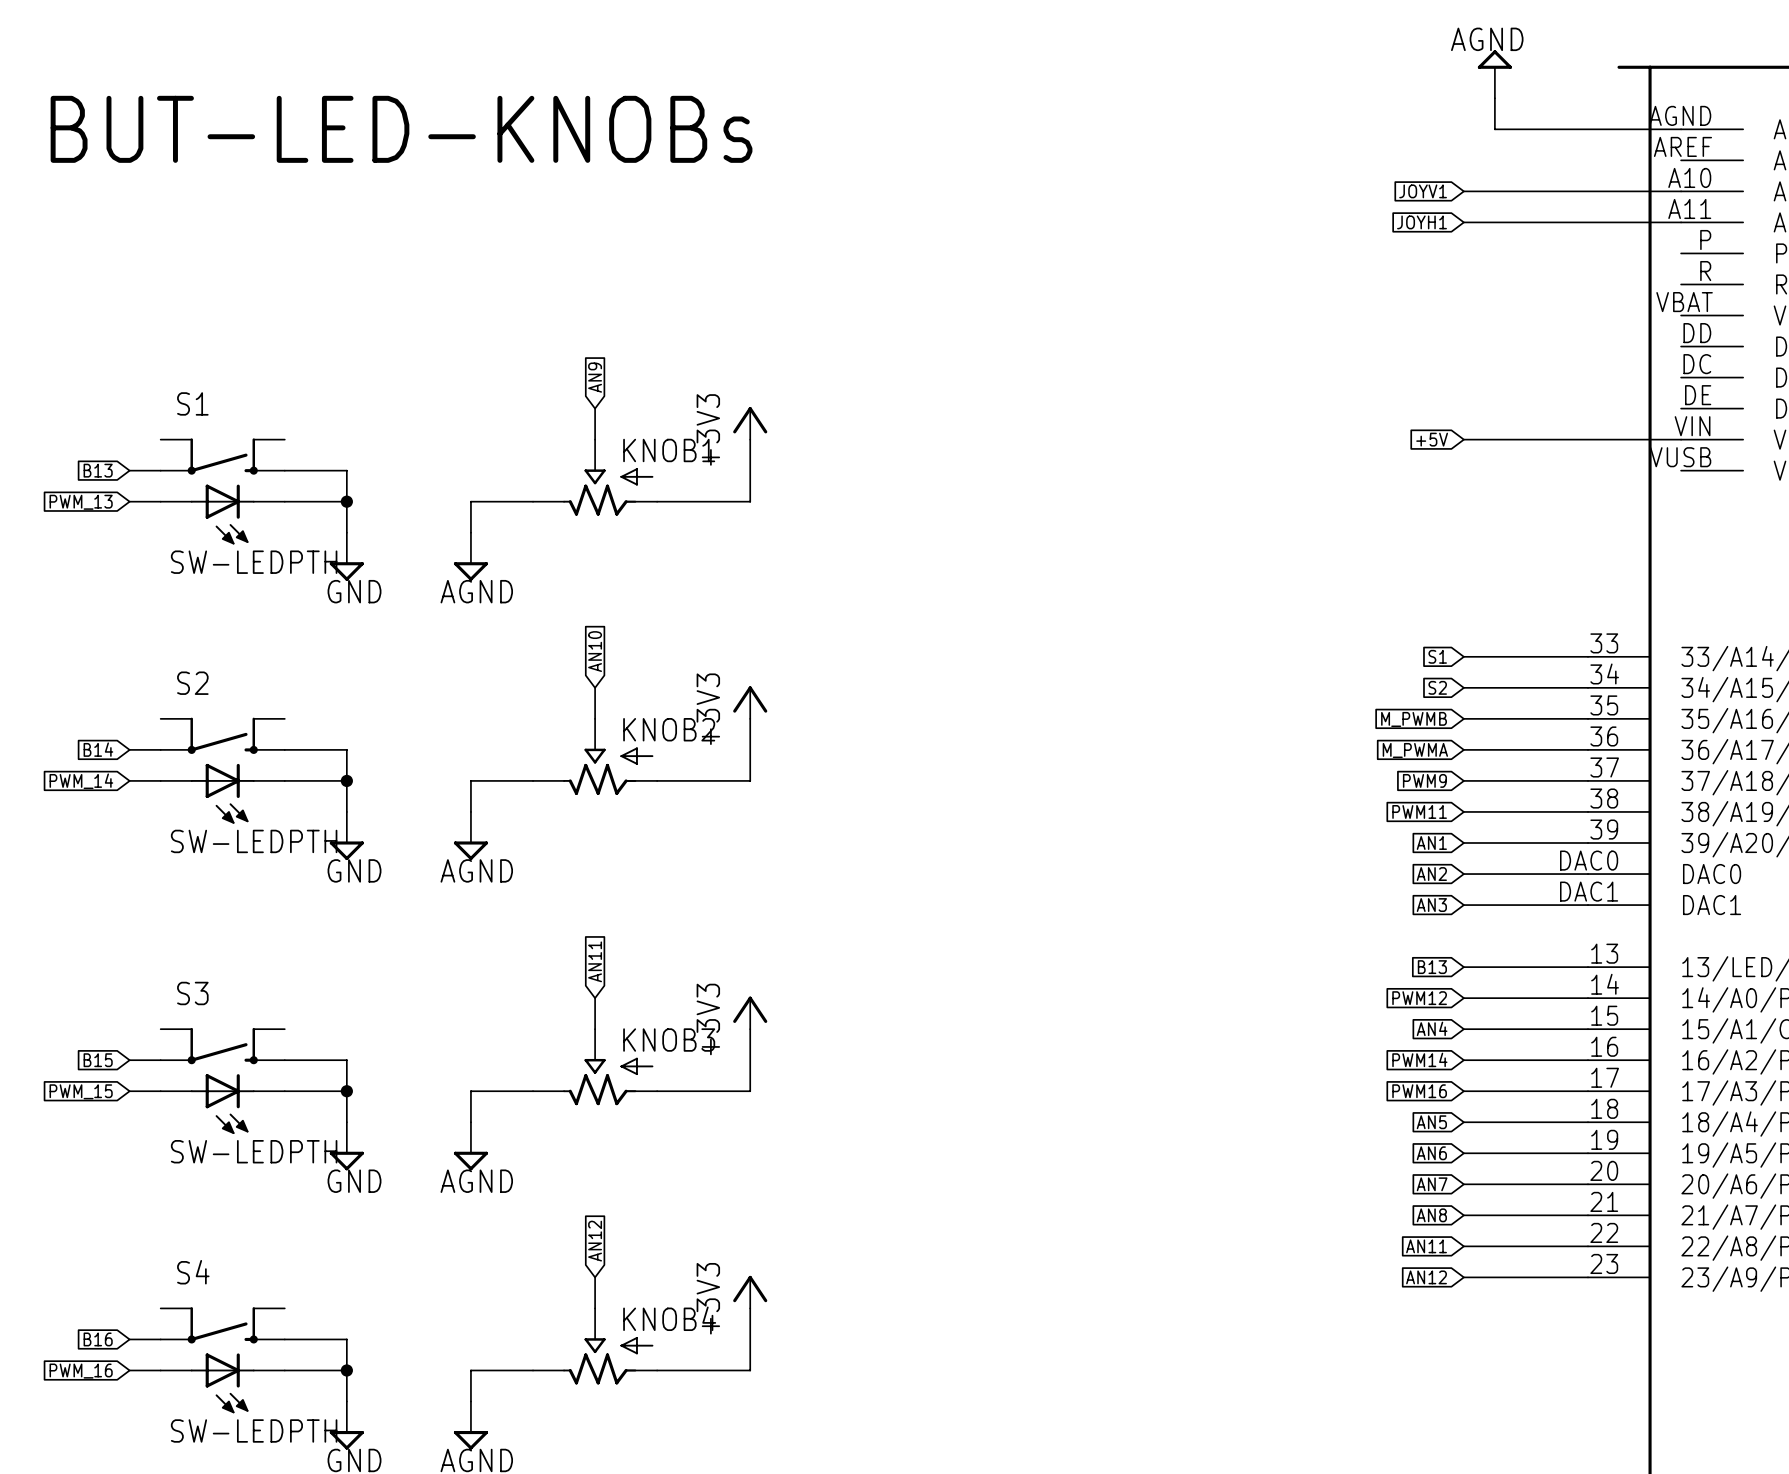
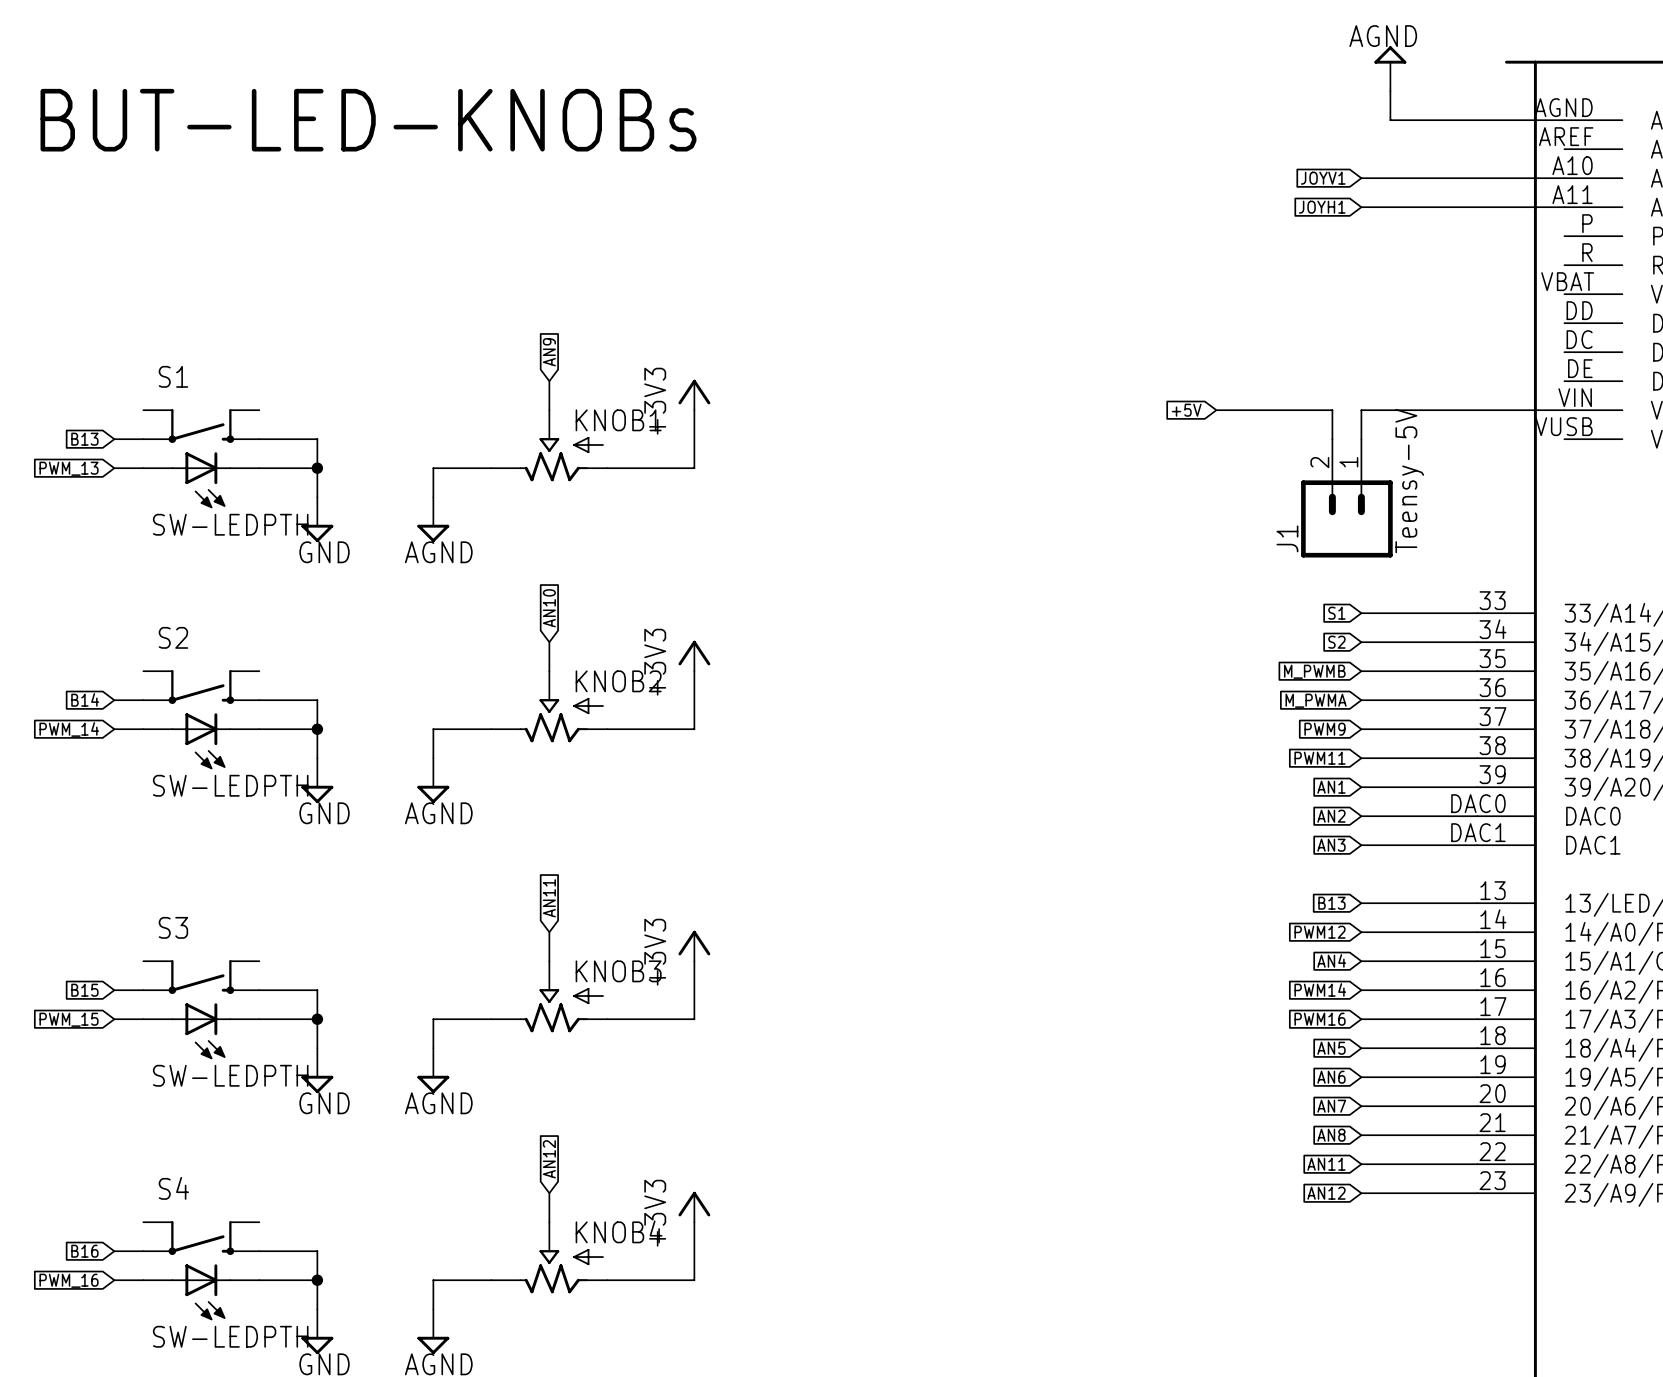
wire: none -> (1216, 410) (1332, 410) (1332, 439)
global label position: +5V (1432, 439) -> +5V (1186, 410)
wire: none -> (1361, 410) (1361, 439)
J1: none -> Teensy-5V (1346, 498)

